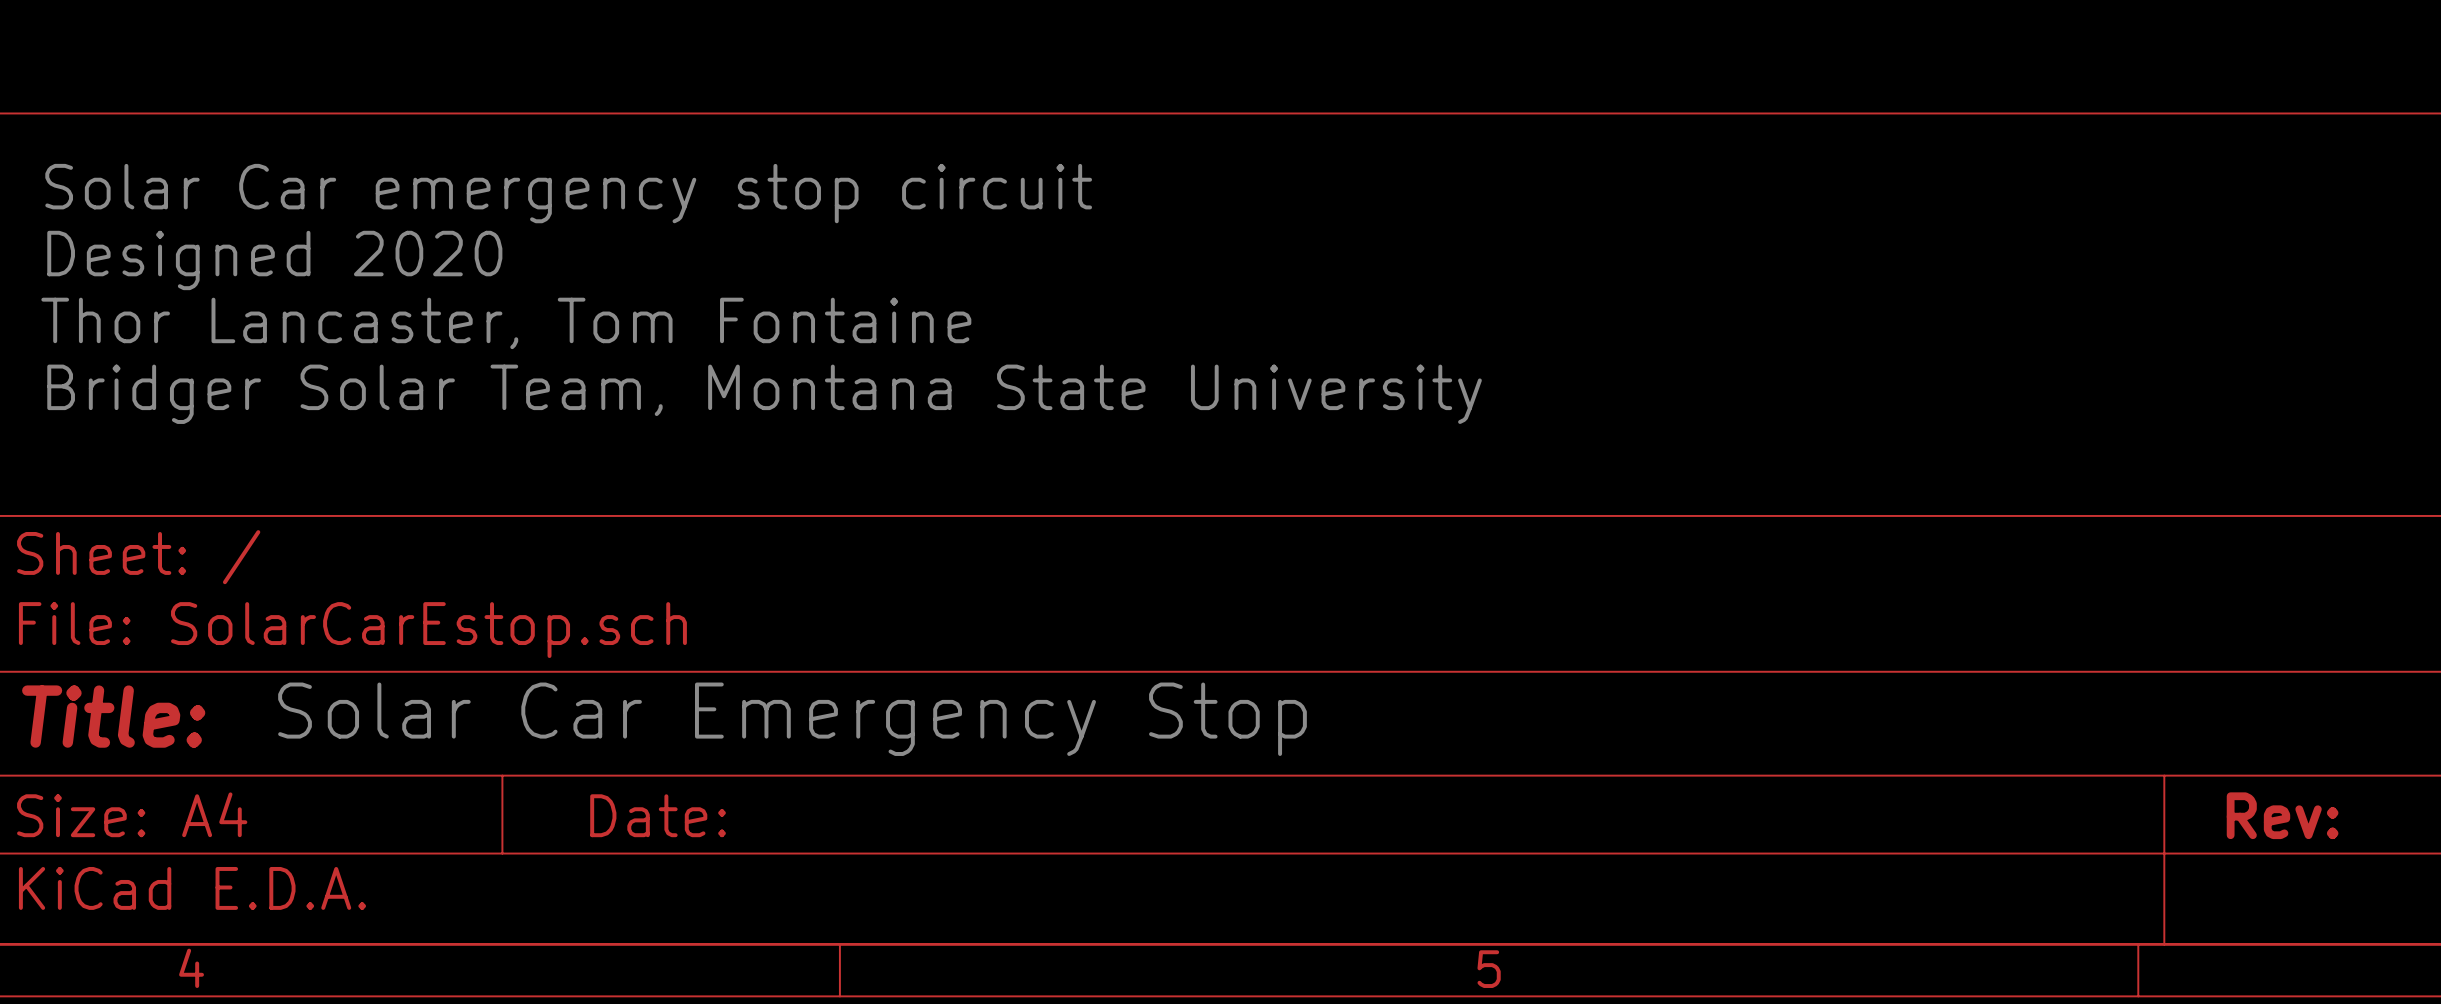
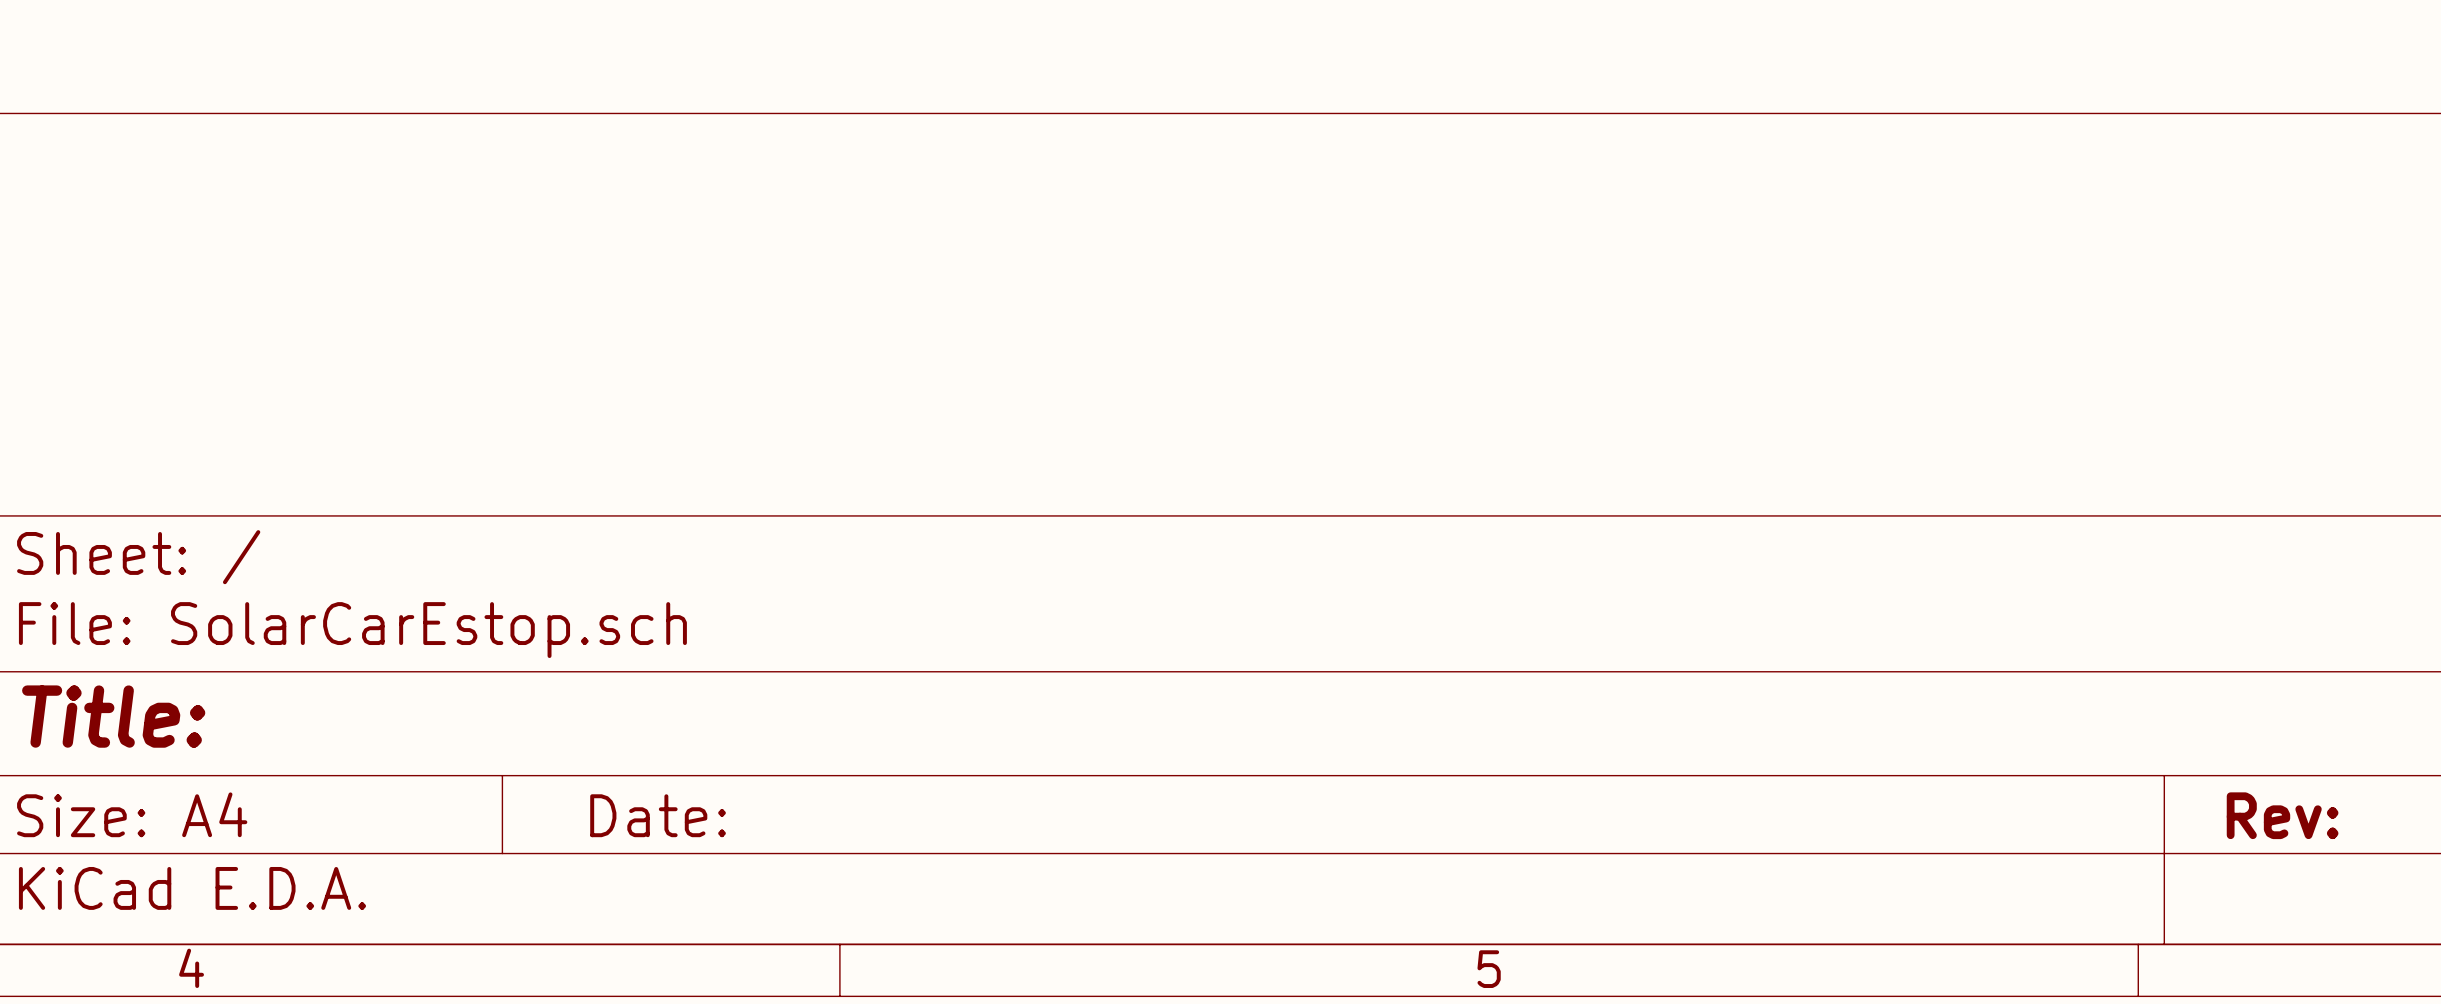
text: Solar Car emergency stop circuit (568, 193) -> none
text: Designed 2020 (274, 260) -> none
text: Thor Lancaster, Tom Fontaine (506, 323) -> none
text: Bridger Solar Team, Montana State University (764, 394) -> none
text: Solar Car Emergency Stop (792, 719) -> none

